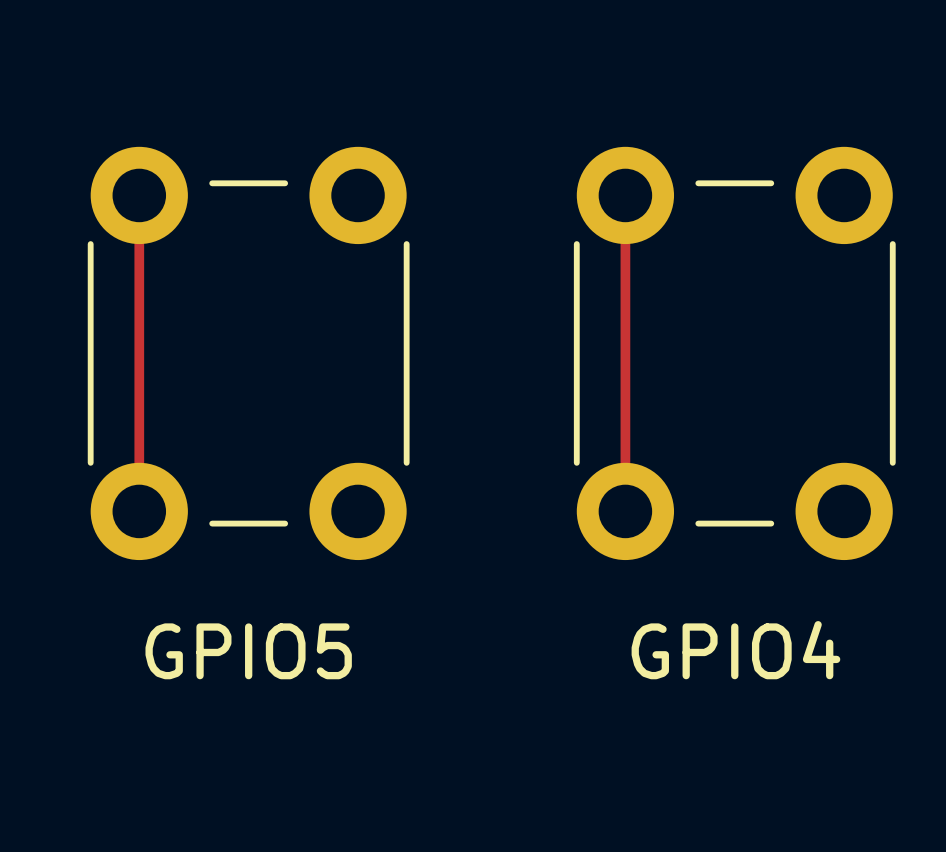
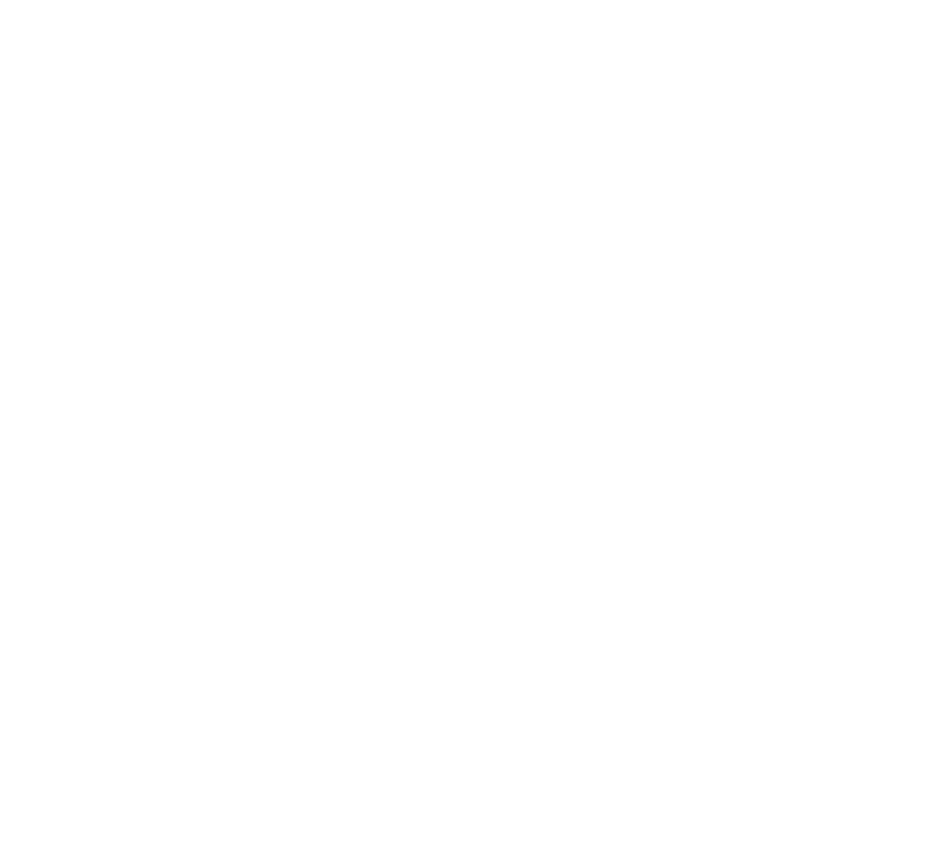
top track: (139, 195) (139, 511) -> none
top track: (625, 195) (625, 511) -> none
part: (248, 353) -> none
part: (734, 353) -> none
text: GPIO4 (735, 650) -> none
text: GPIO5 (248, 651) -> none

